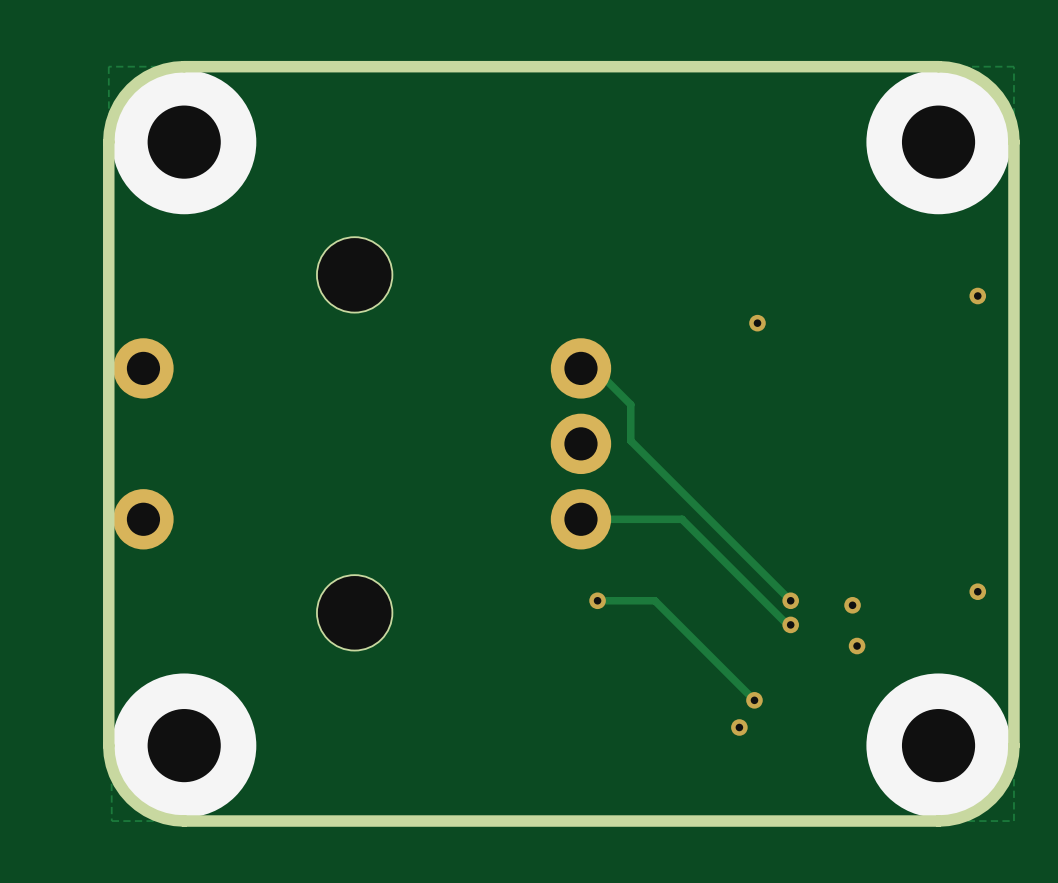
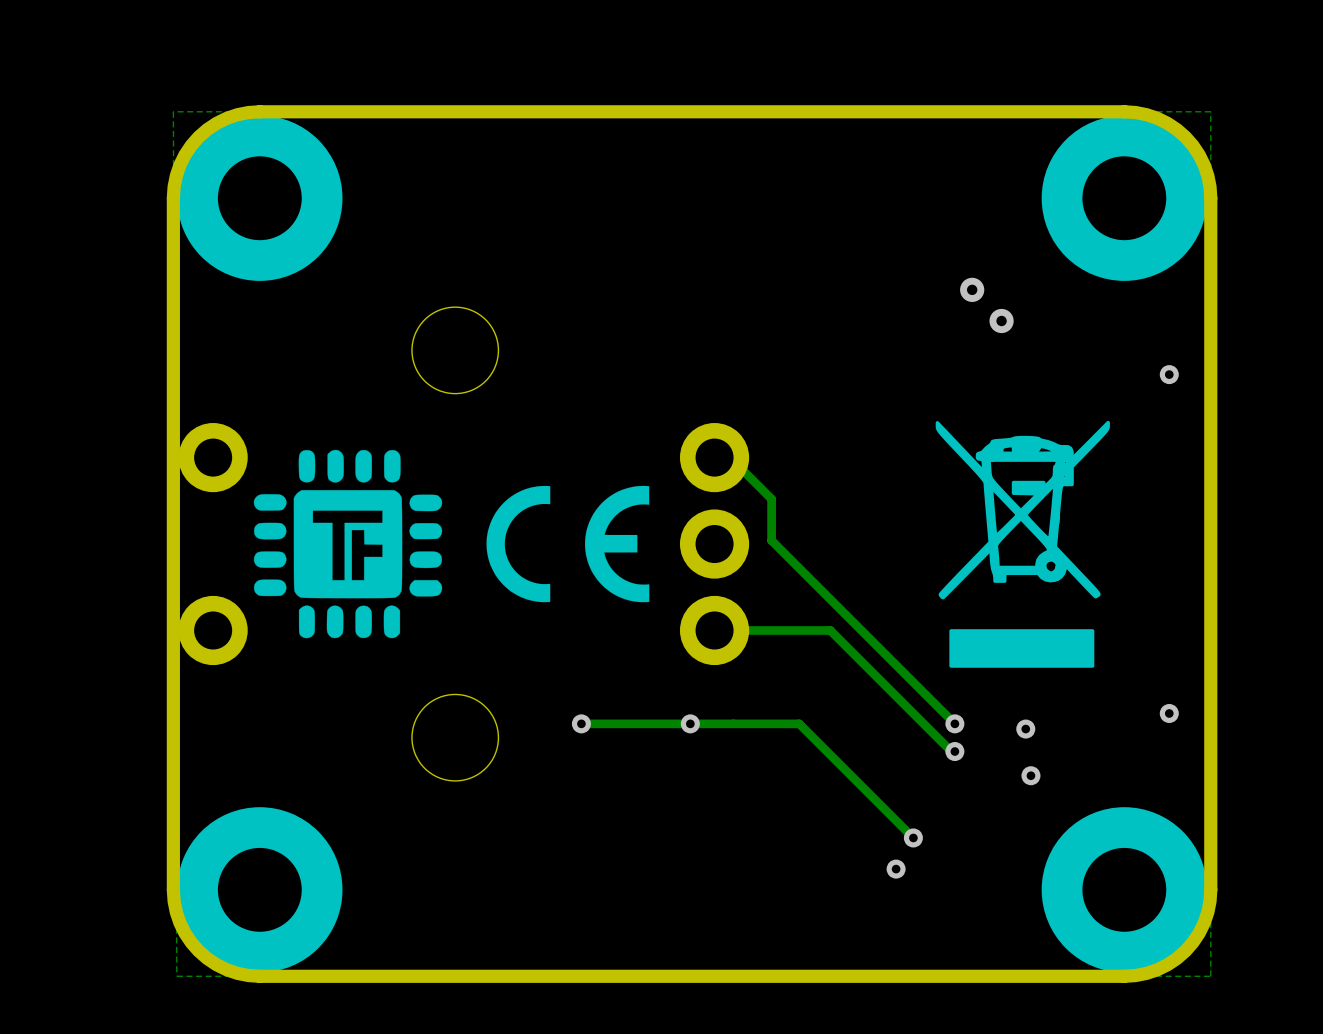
via: none -> (972, 289)
via: none -> (1001, 320)
via: (757, 323) -> none
drawing: none -> [935, 420, 1110, 668]
drawing: none -> [253, 449, 443, 639]
drawing: none -> [486, 485, 650, 603]
via: none -> (581, 723)
track: none -> (733, 723) (581, 723)
via position: (597, 600) -> (690, 723)

